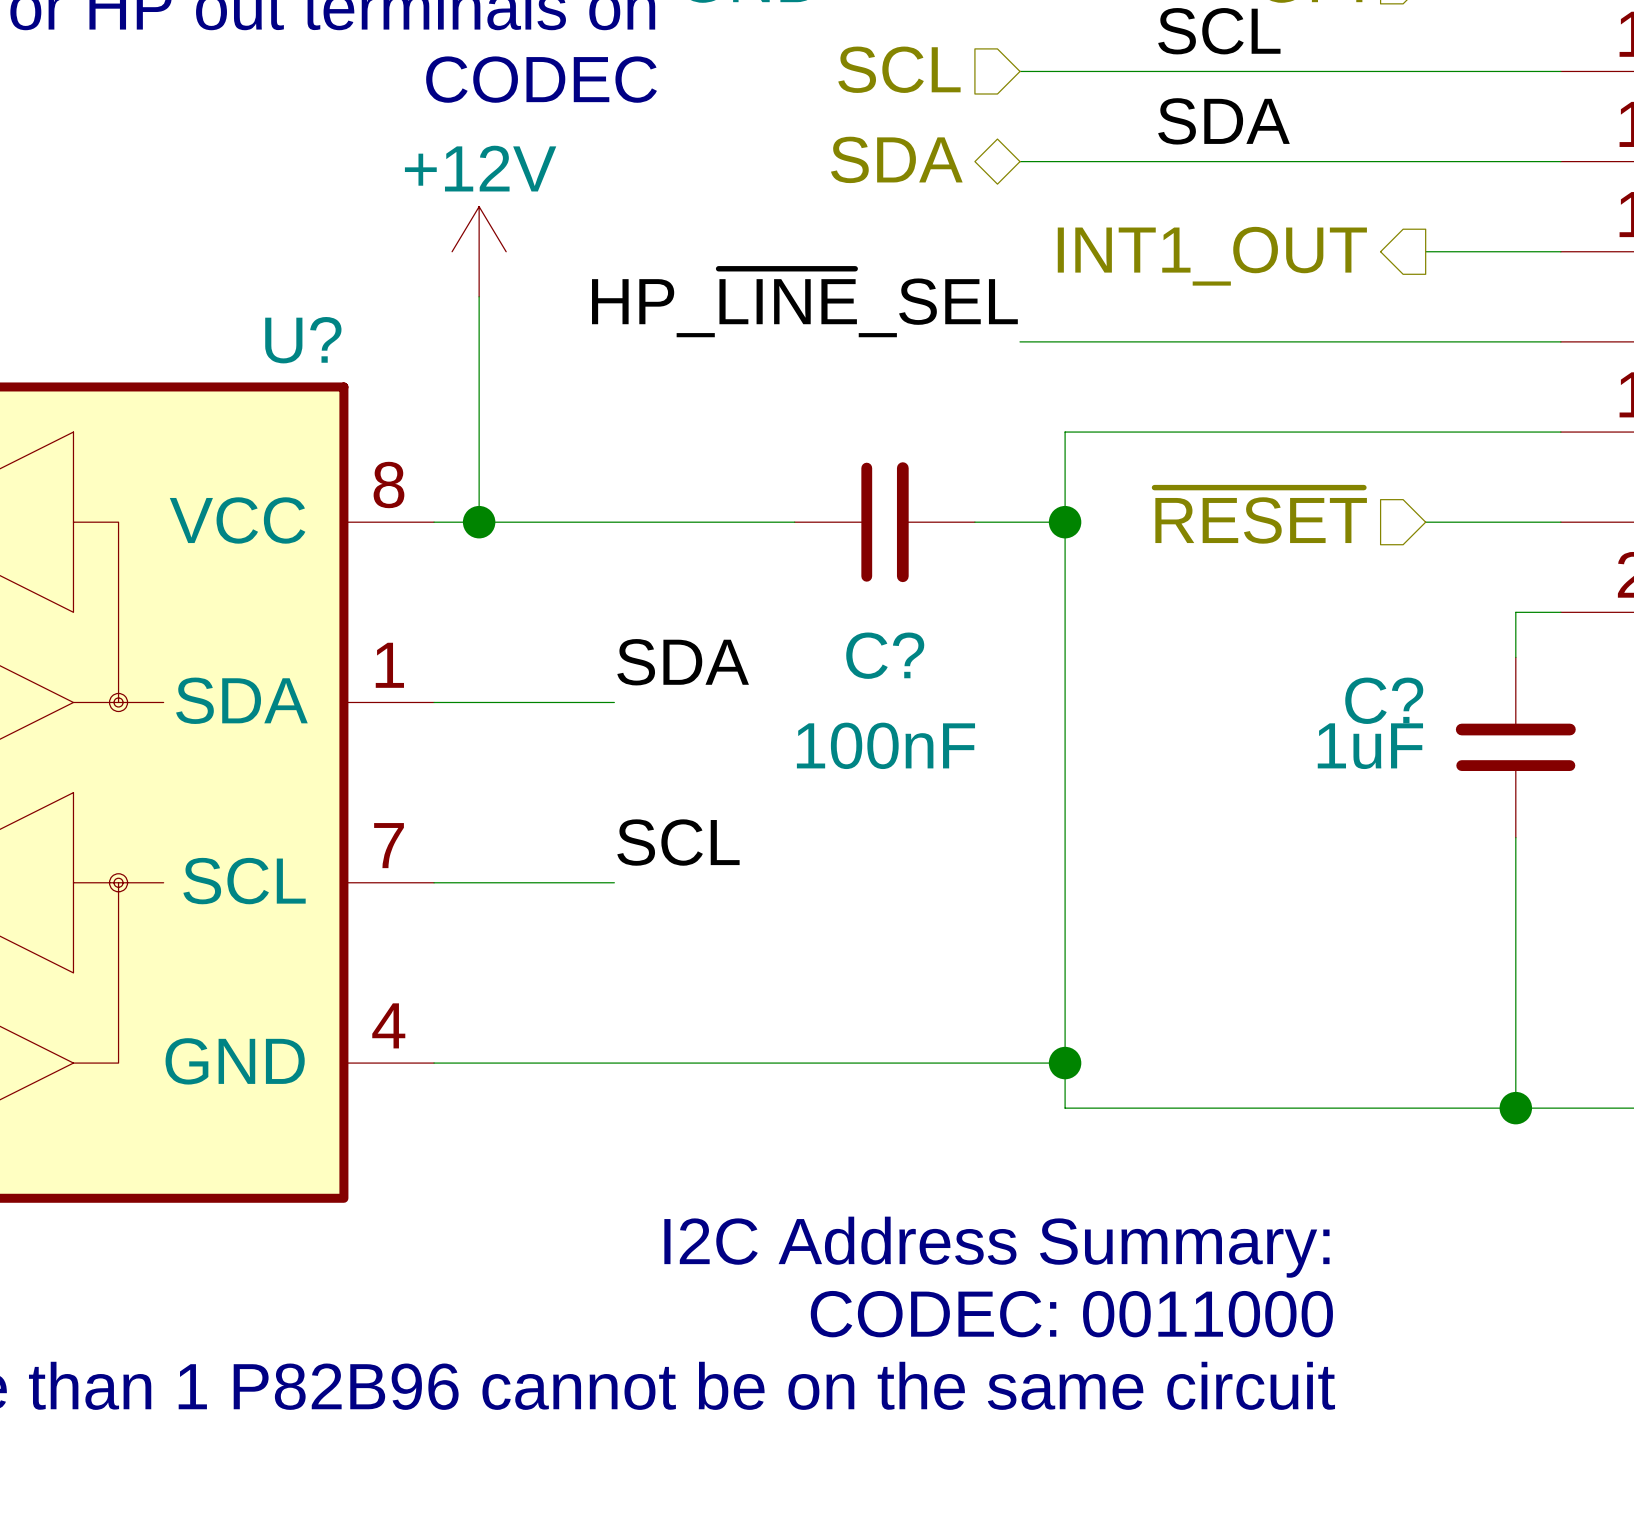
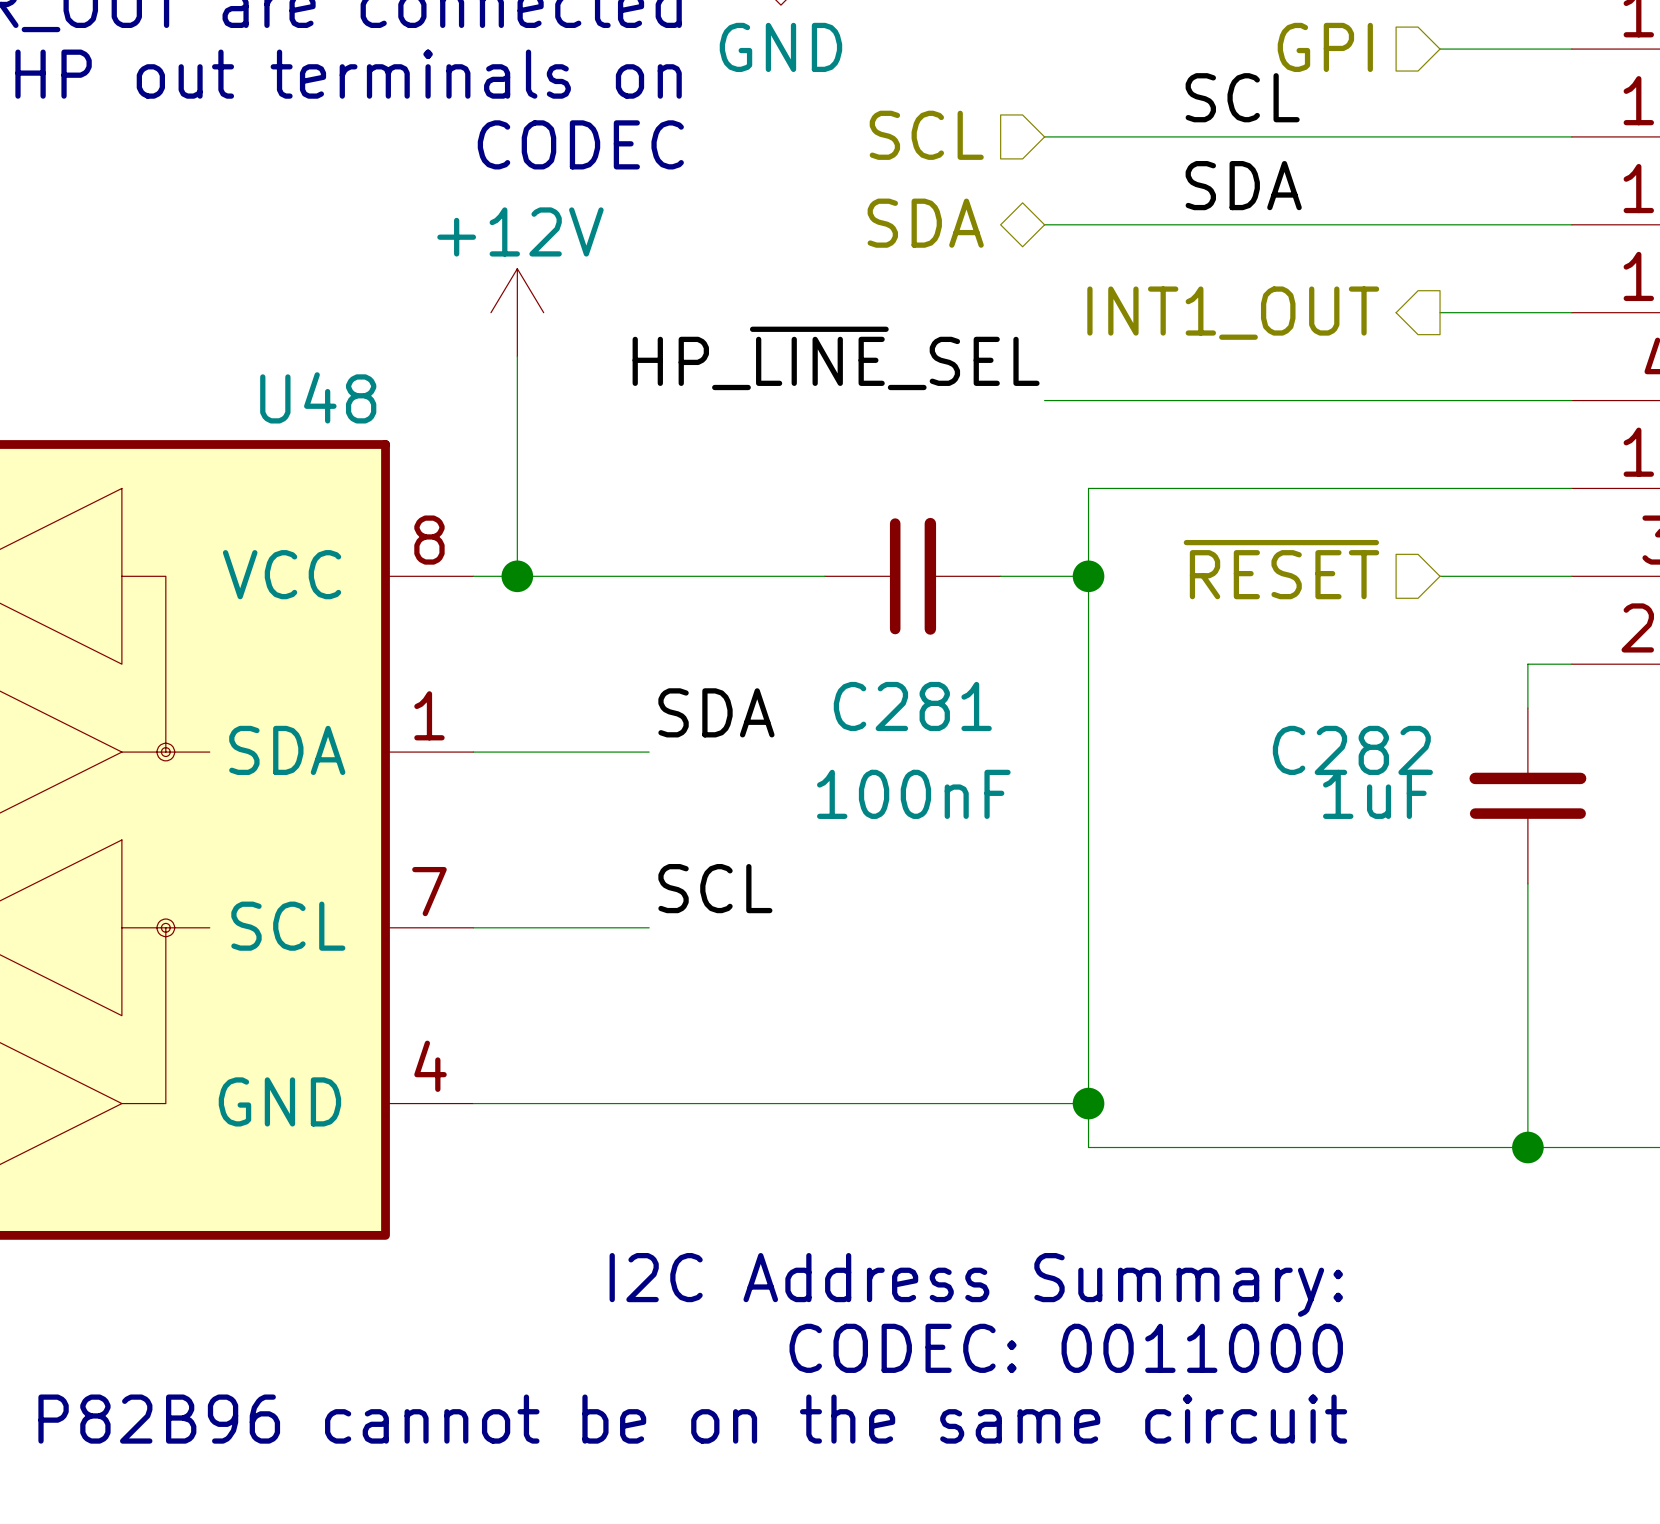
U? name: U? (303, 340) -> U48 (318, 397)
C? name: C? (885, 655) -> C281 (912, 706)
C? name: C? (1384, 700) -> C282 (1351, 750)

